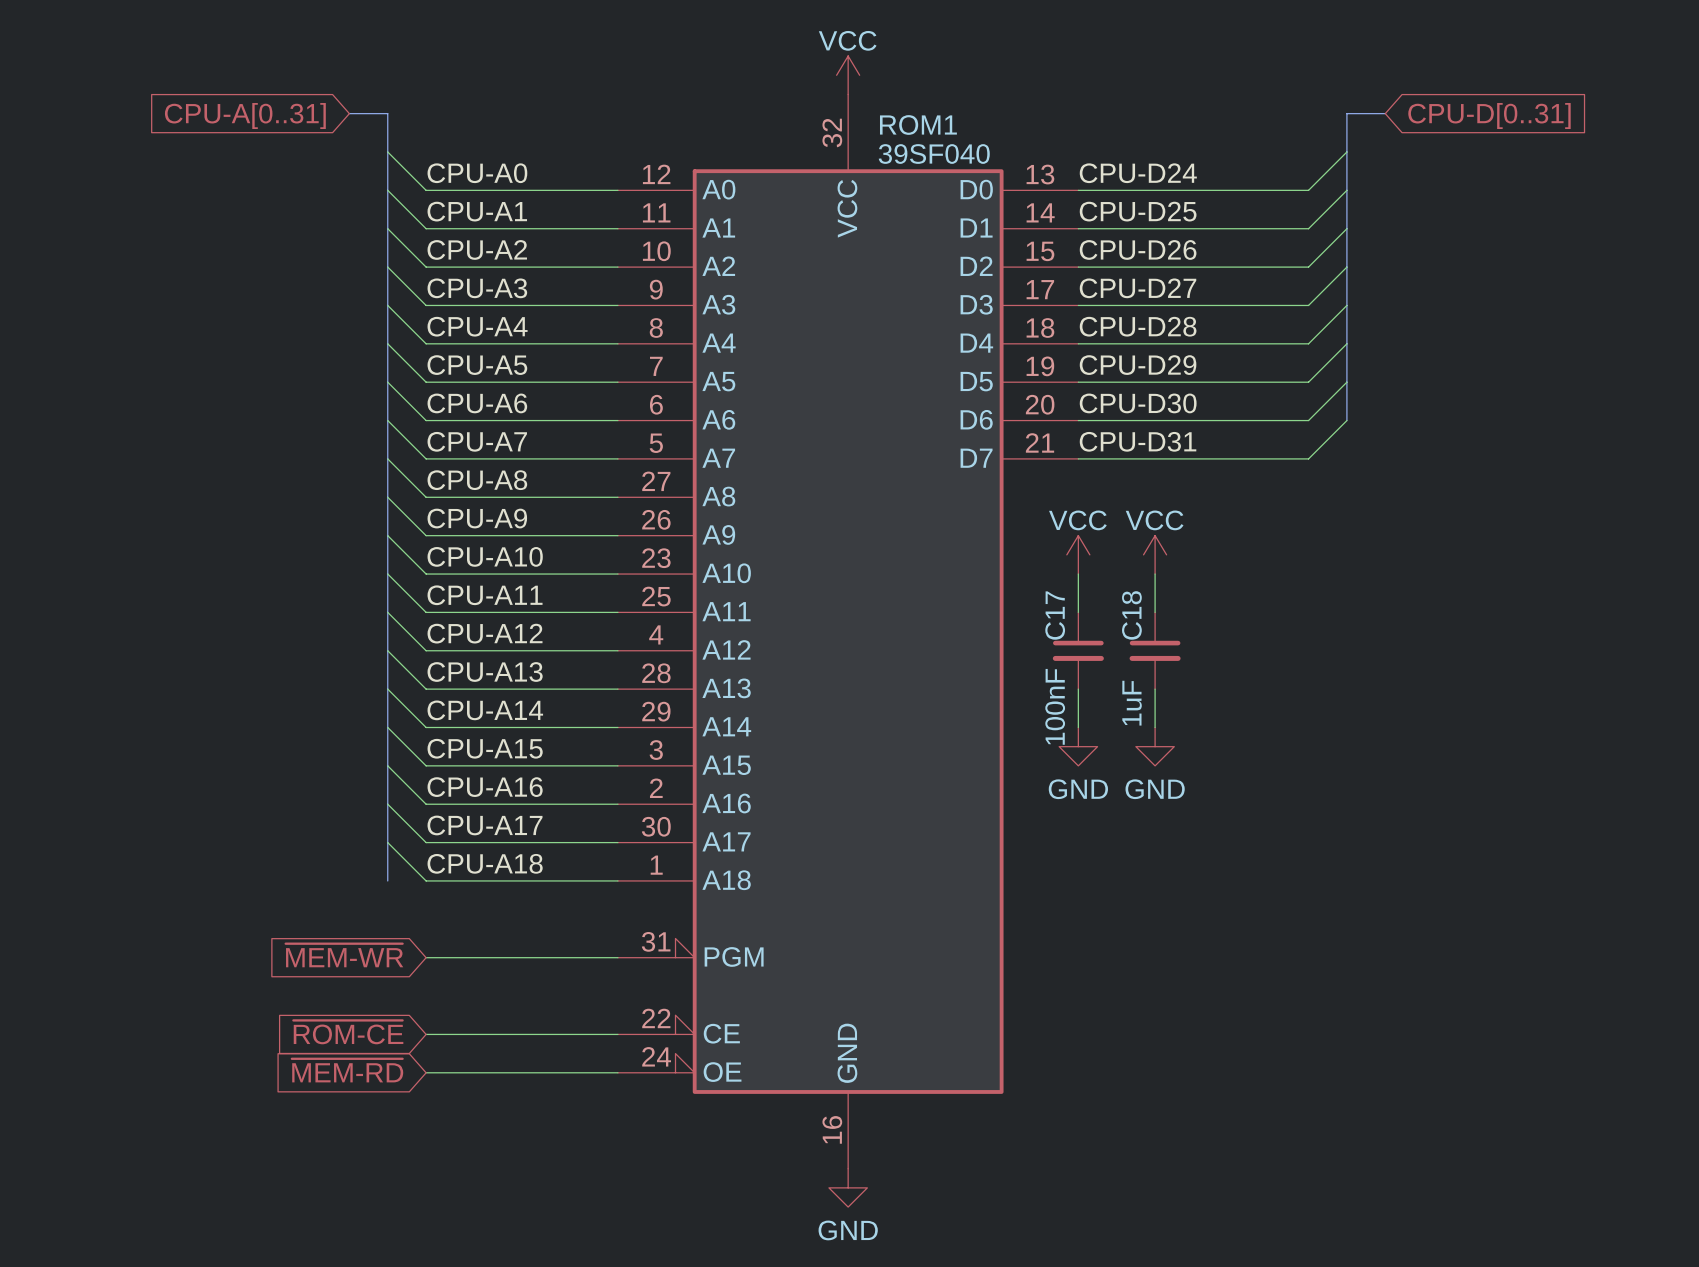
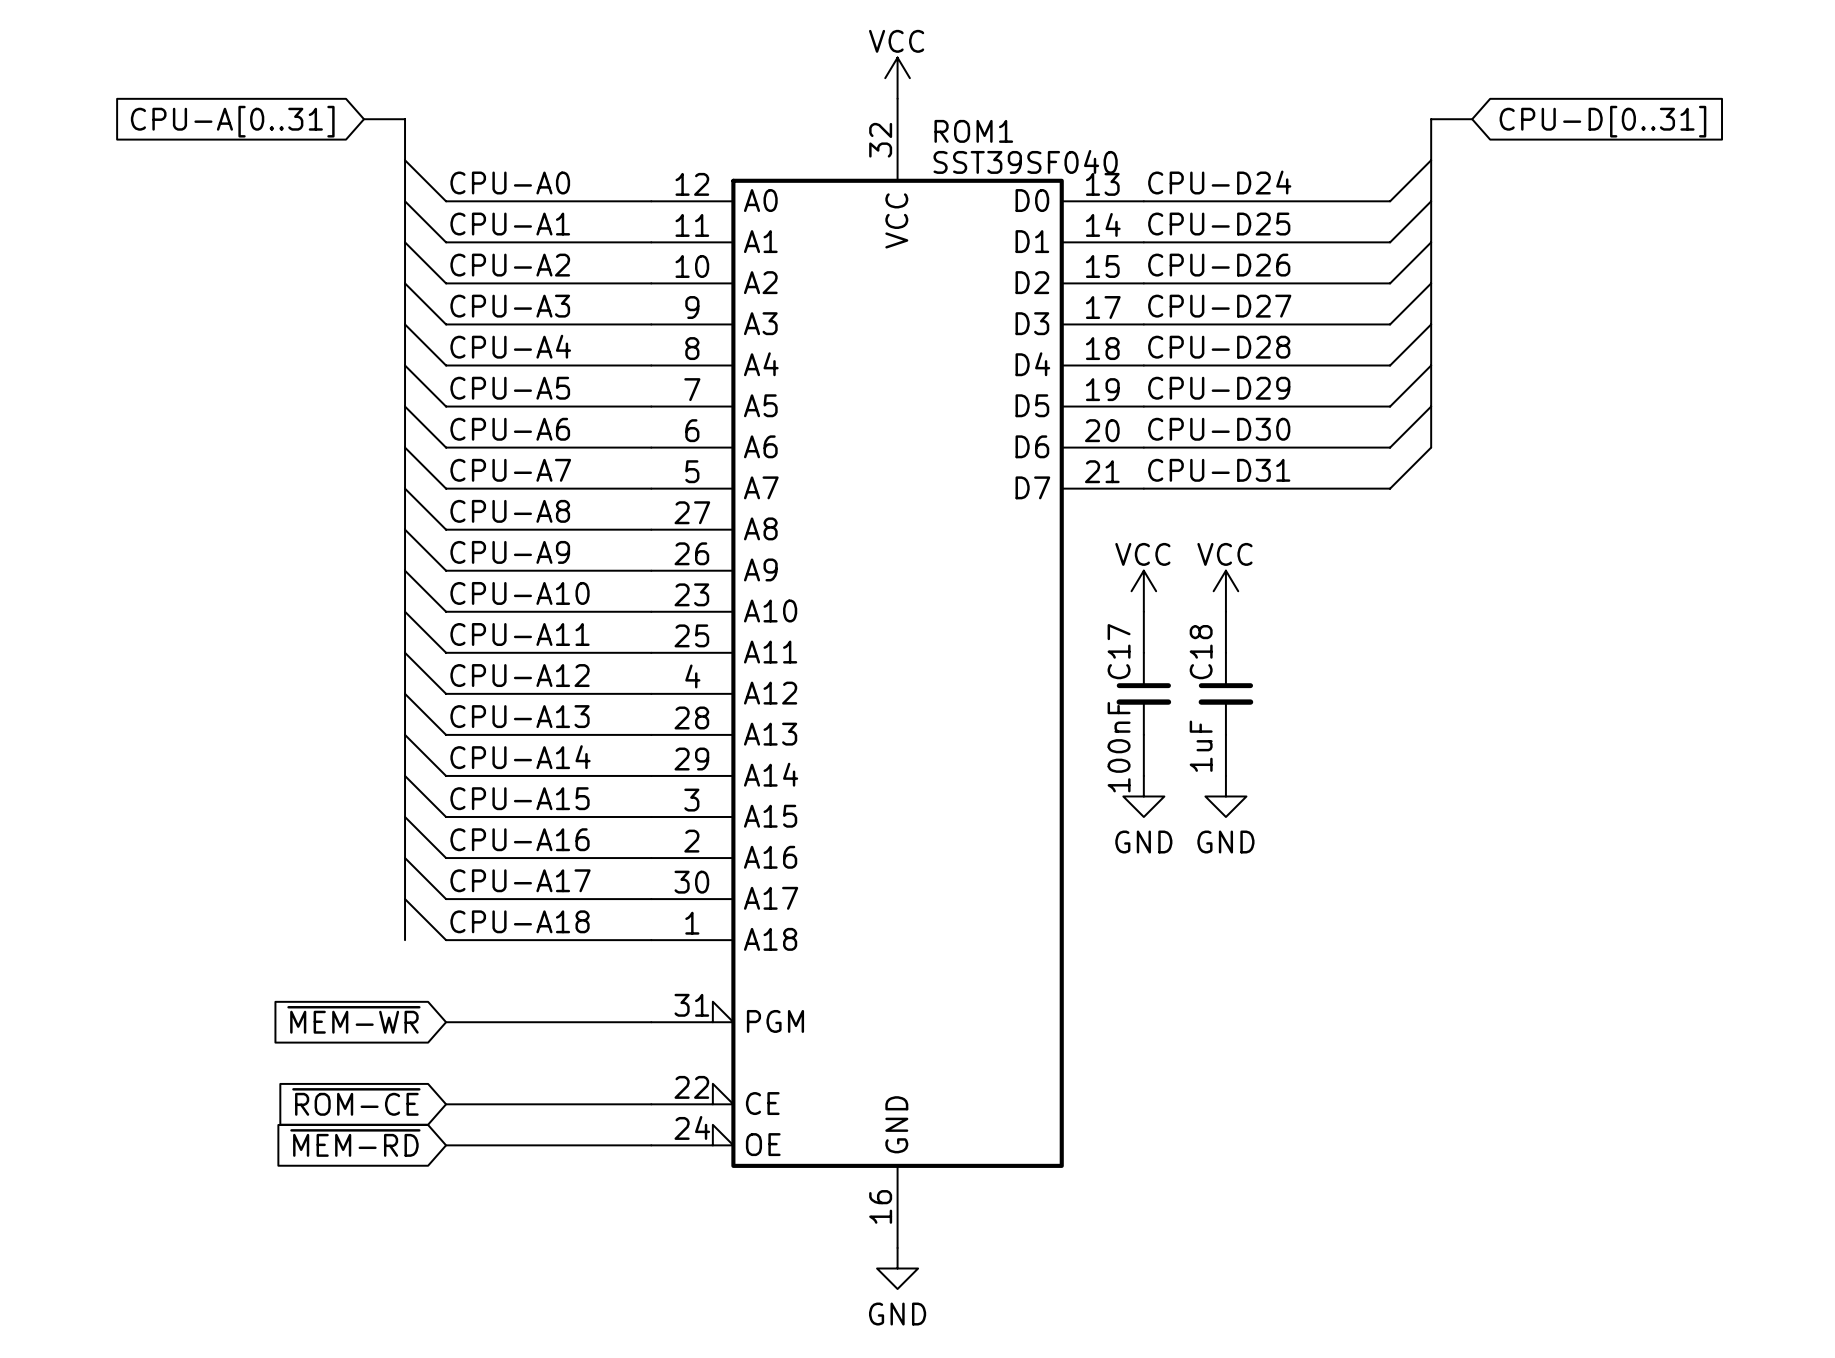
ROM1 value: 39SF040 (934, 154) -> SST39SF040 (1025, 161)

